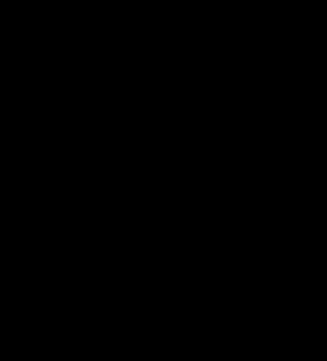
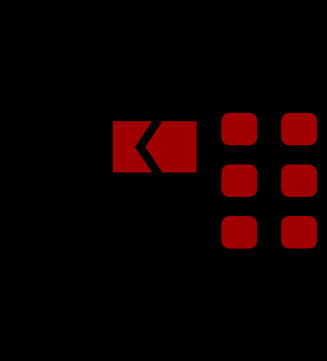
part: none -> (269, 129)
part: none -> (154, 146)
part: none -> (269, 180)
part: none -> (269, 232)

